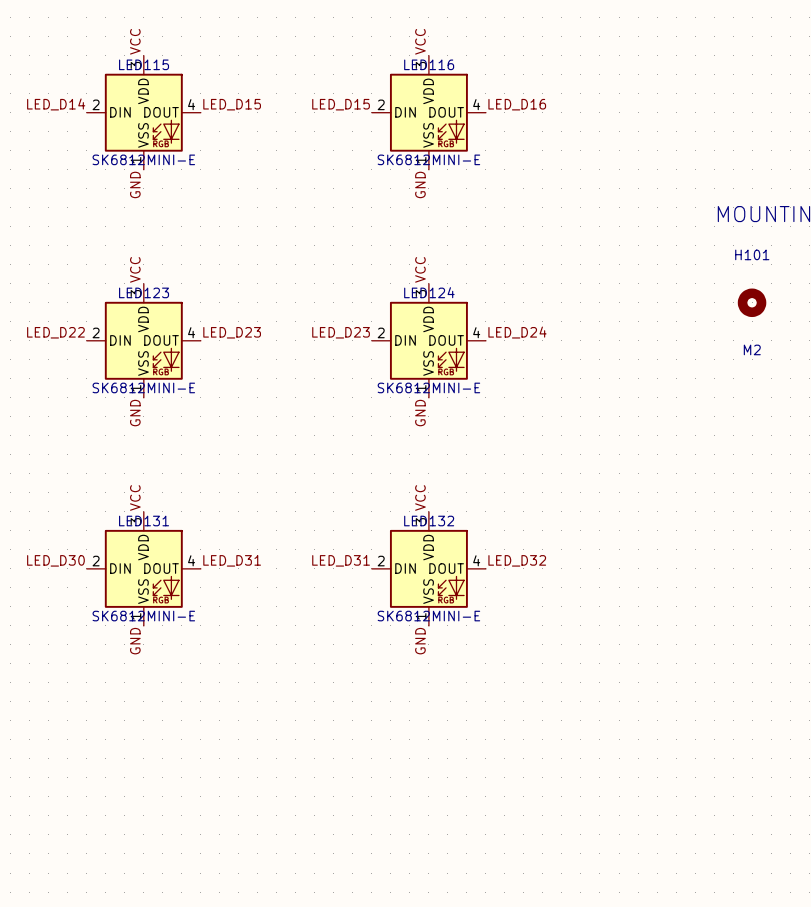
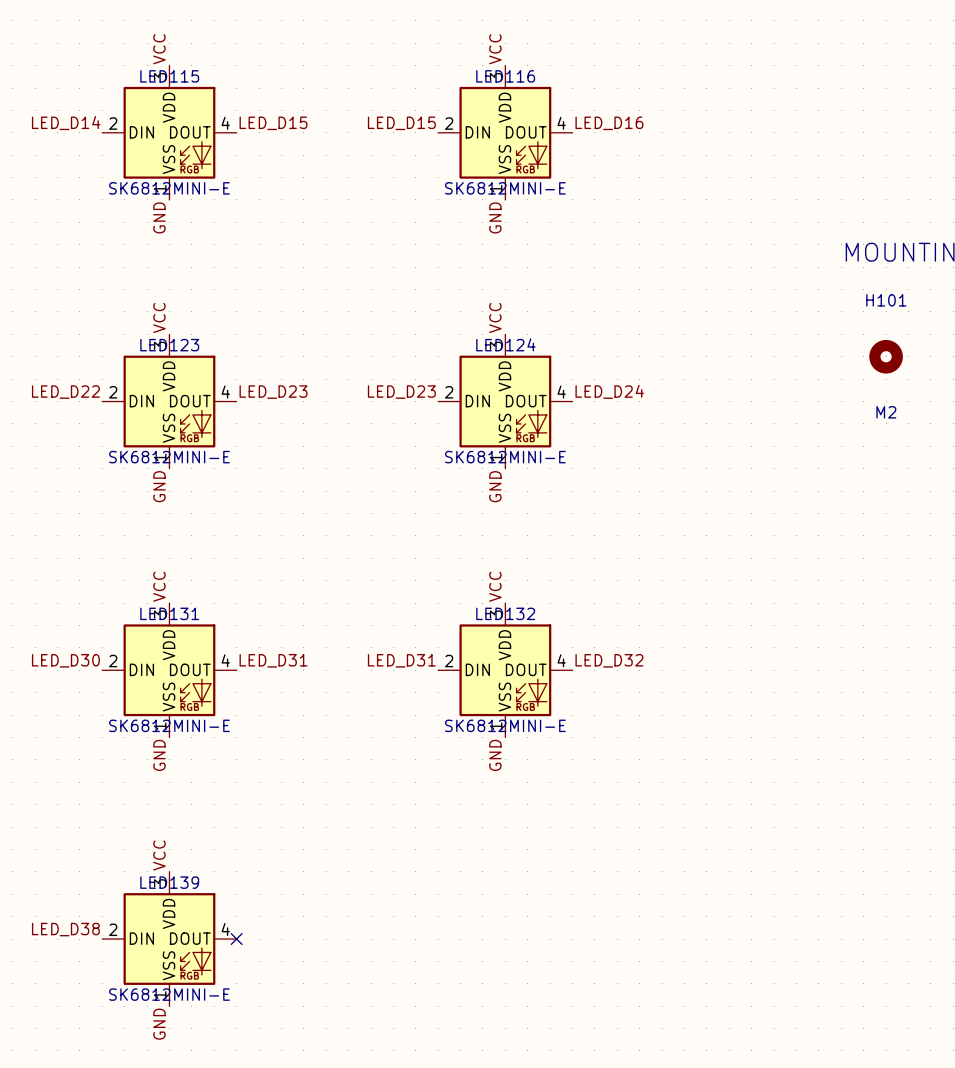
label: none -> VCC (159, 855)
label: none -> LED_D38 (65, 929)
LED139: none -> SK6812MINI-E (169, 939)
no-connect mark: none -> (236, 939)
label: none -> GND (159, 1024)

